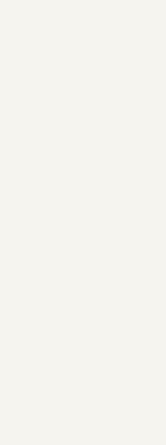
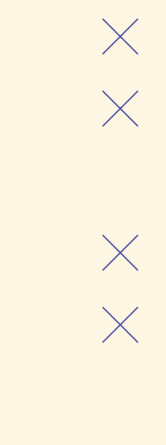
no-connect mark: none -> (120, 36)
no-connect mark: none -> (120, 108)
no-connect mark: none -> (120, 252)
no-connect mark: none -> (120, 324)

